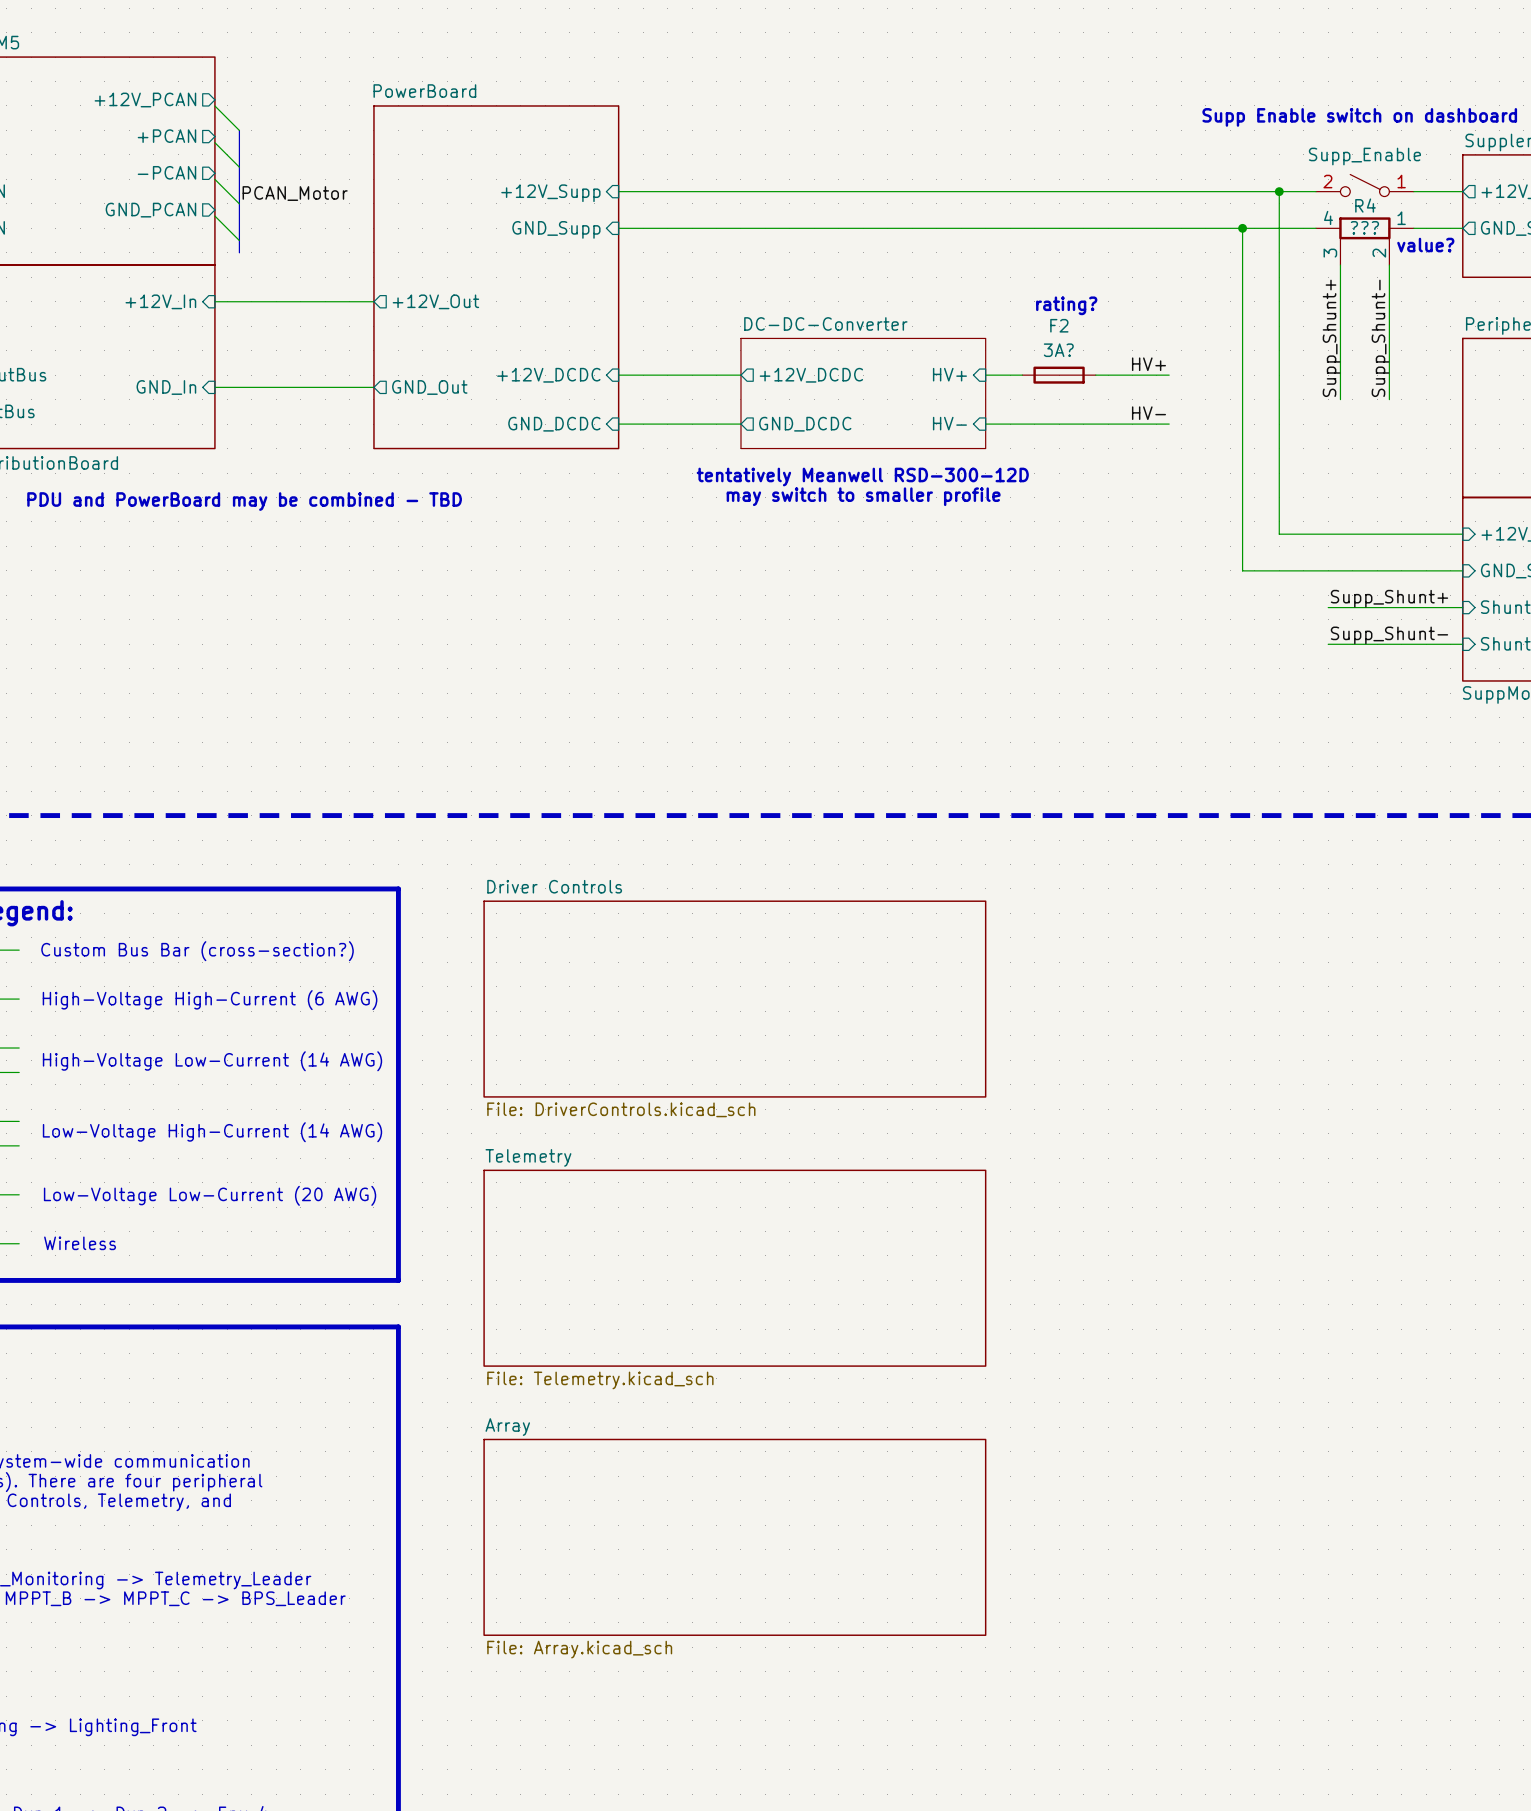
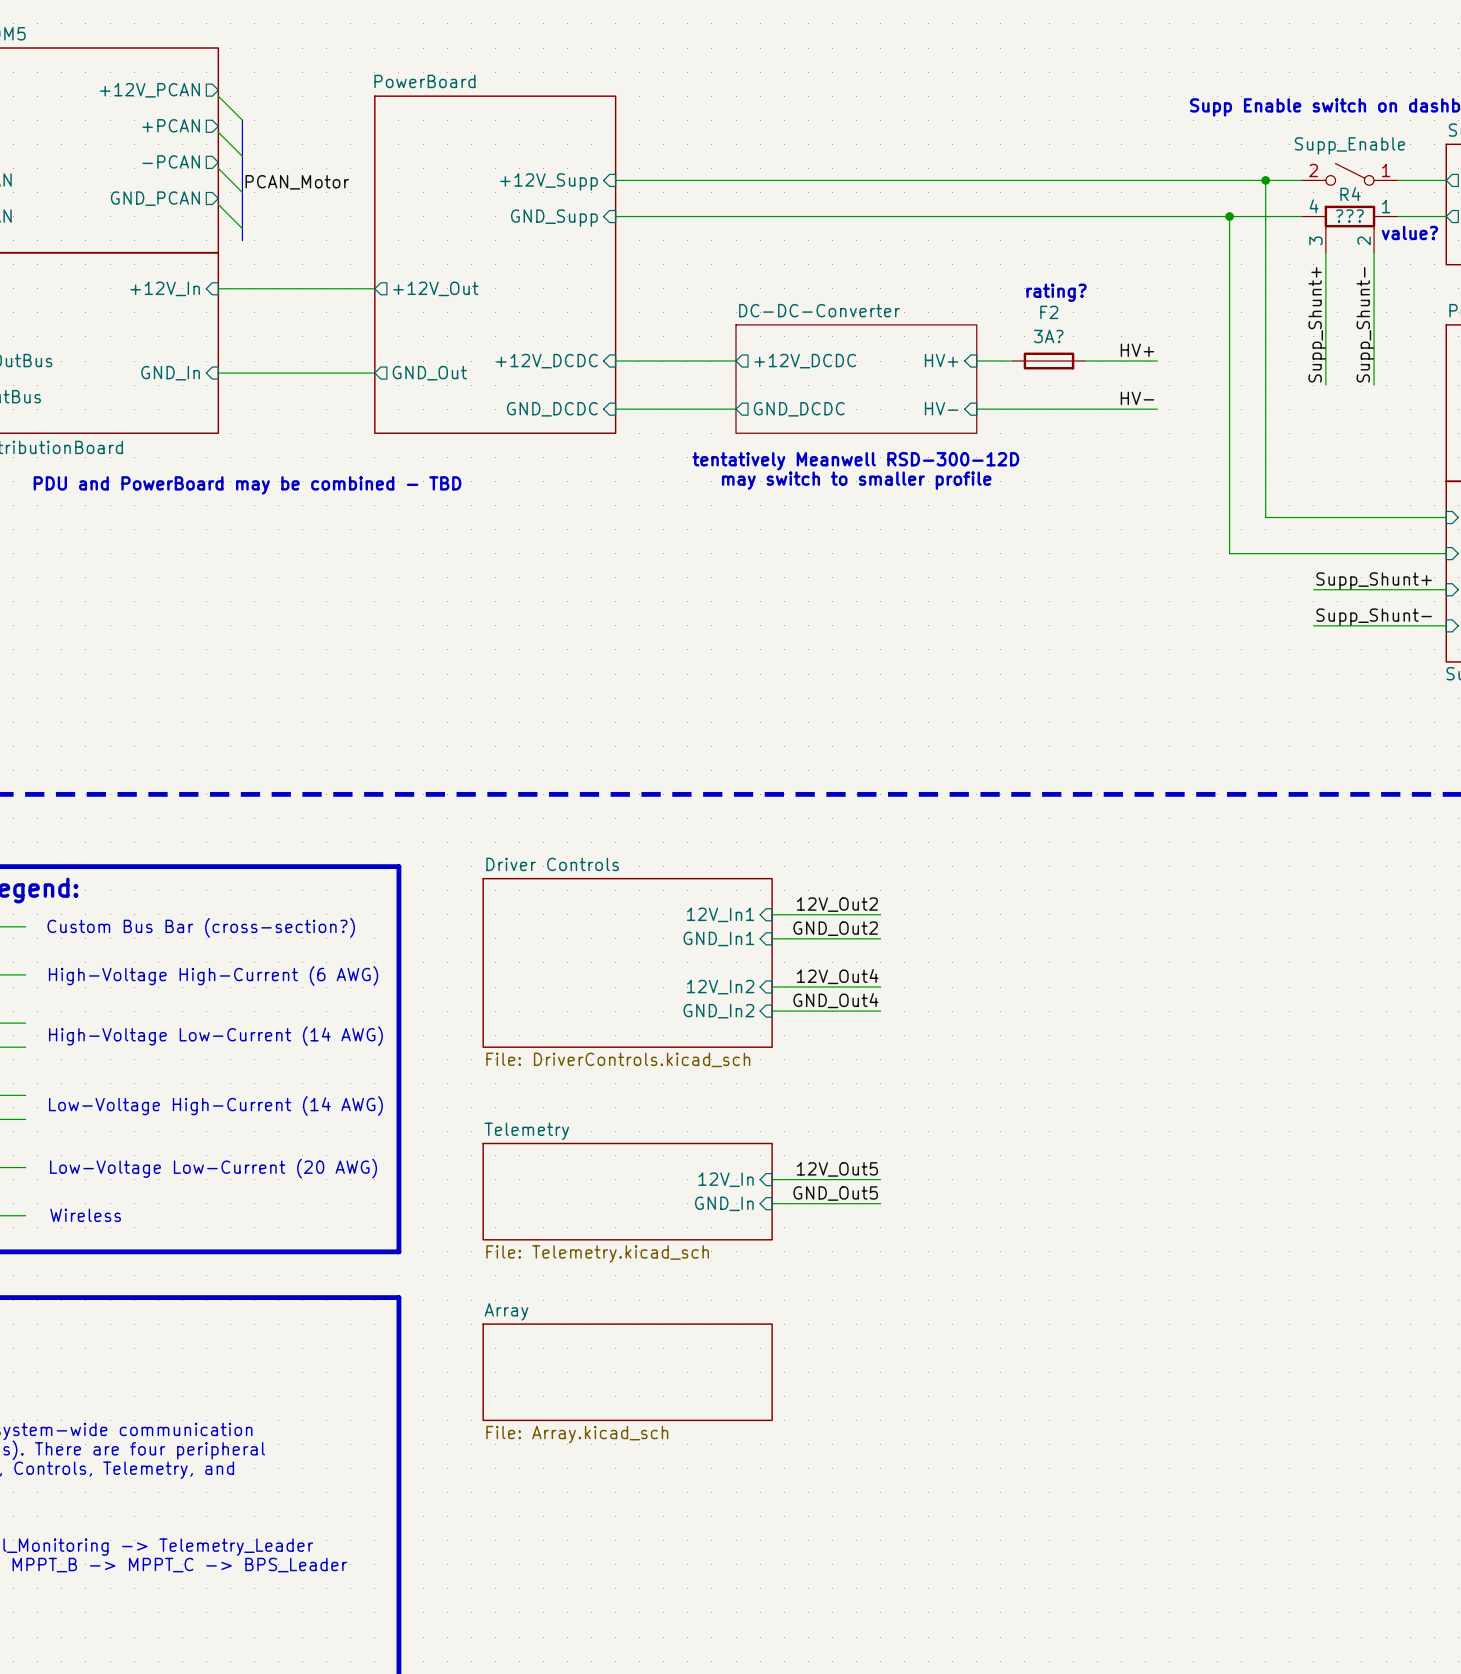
label: none -> 12V_Out2 (837, 904)
wire: none -> (772, 914) (880, 914)
sheet pin: none -> 12V_In1 (720, 914)
label: none -> GND_Out2 (835, 928)
sheet pin: none -> GND_In1 (718, 938)
wire: none -> (772, 938) (880, 938)
sheet Driver Controls: none -> File: DriverControls.kicad_sch (627, 962)
sheet Driver Controls: File: DriverControls.kicad_sch (734, 999) -> none
label: none -> 12V_Out4 (837, 976)
sheet pin: none -> 12V_In2 (720, 987)
wire: none -> (772, 987) (880, 987)
label: none -> GND_Out4 (835, 1000)
sheet pin: none -> GND_In2 (718, 1011)
wire: none -> (772, 1011) (880, 1011)
label: none -> 12V_Out5 (837, 1169)
sheet pin: none -> 12V_In (726, 1179)
wire: none -> (772, 1179) (880, 1179)
sheet Telemetry: none -> File: Telemetry.kicad_sch (627, 1191)
label: none -> GND_Out5 (835, 1193)
sheet pin: none -> GND_In (724, 1203)
wire: none -> (772, 1203) (880, 1203)
sheet Telemetry: File: Telemetry.kicad_sch (734, 1268) -> none
sheet Array: none -> File: Array.kicad_sch (627, 1372)
sheet Array: File: Array.kicad_sch (734, 1537) -> none

